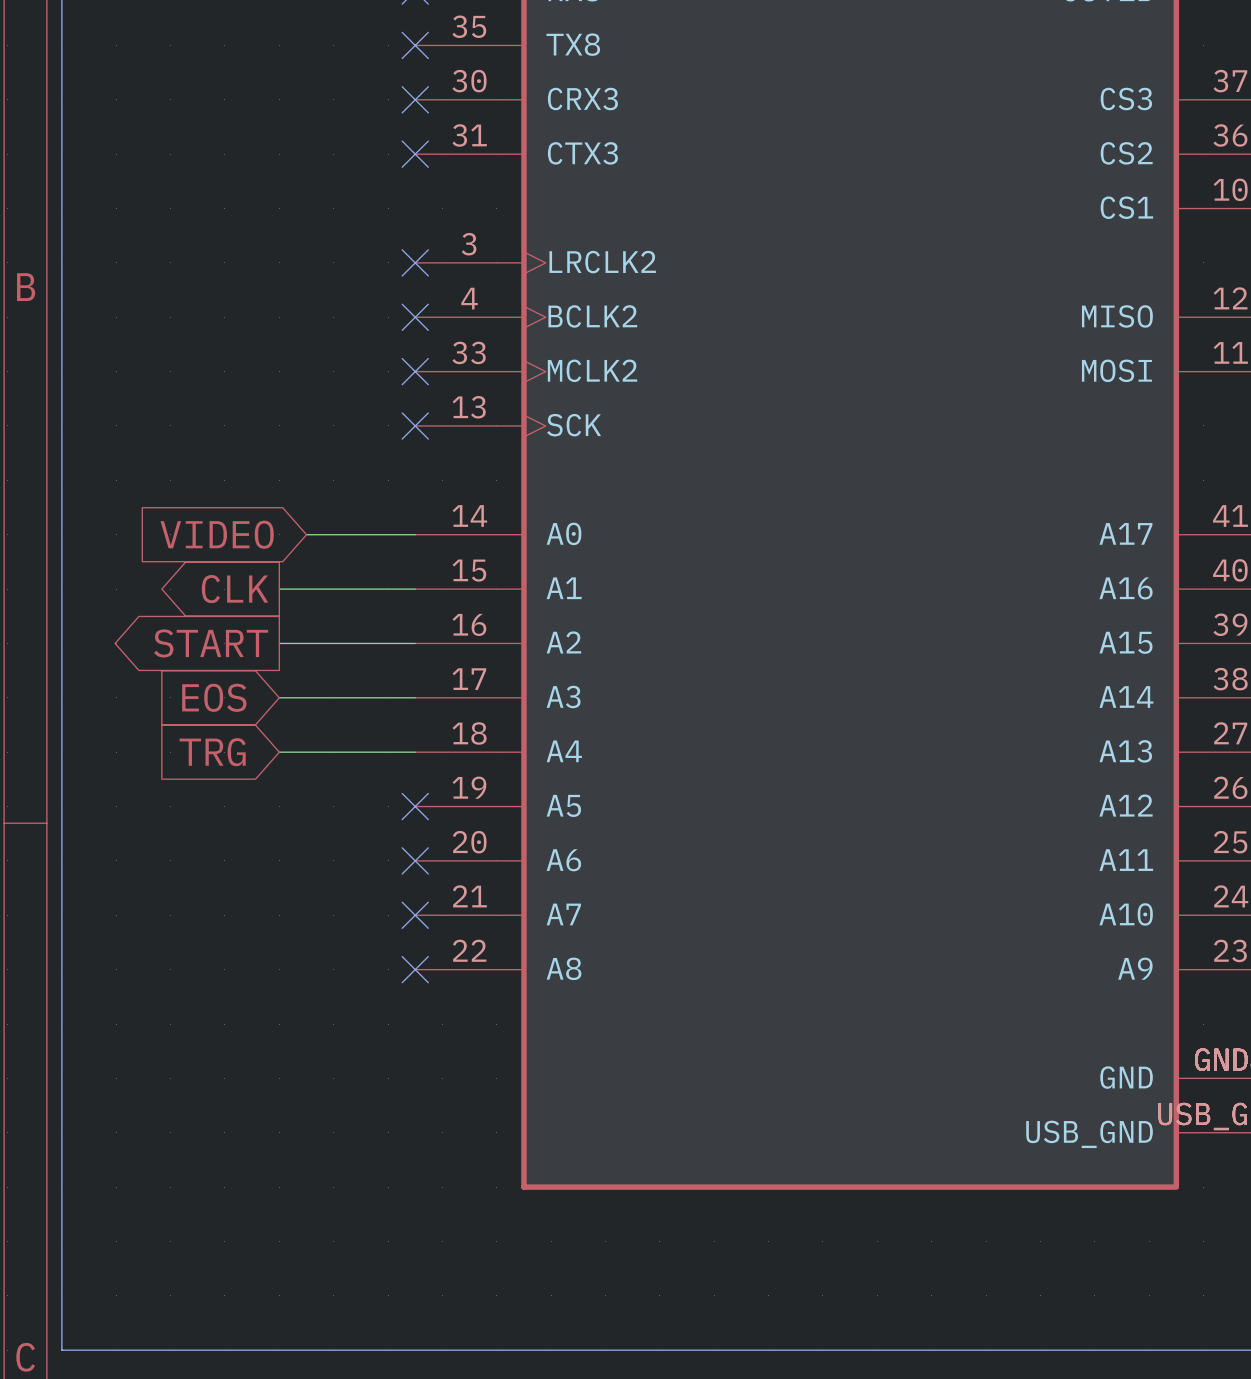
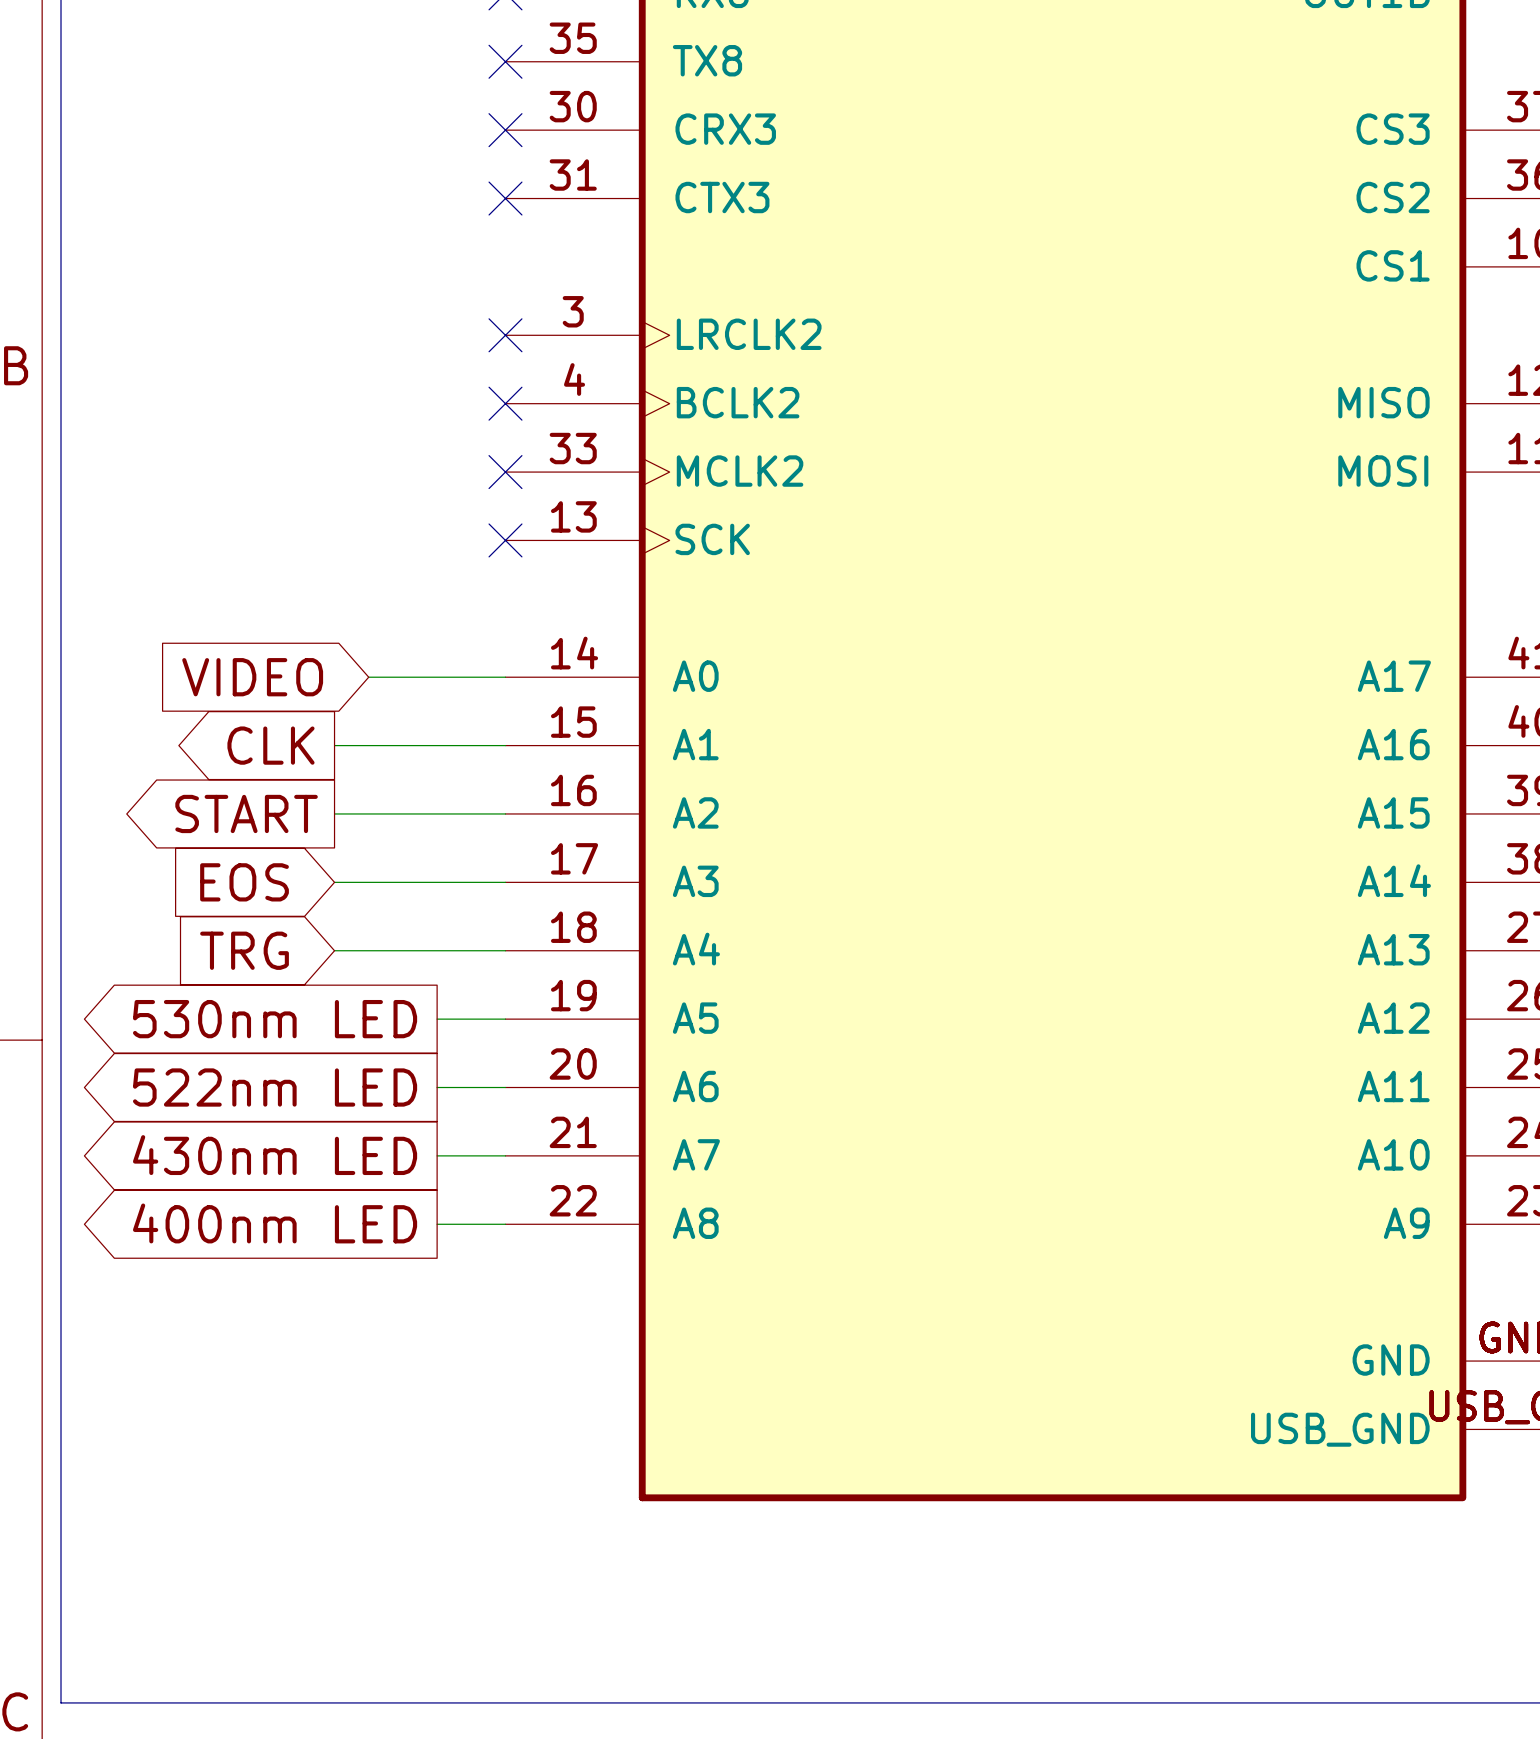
global label: none -> 530nm LED (275, 1019)
wire: none -> (437, 1019) (505, 1019)
no-connect mark: (415, 806) -> none
global label: none -> 522nm LED (275, 1087)
wire: none -> (437, 1087) (505, 1087)
no-connect mark: (415, 860) -> none
global label: none -> 430nm LED (275, 1155)
wire: none -> (437, 1155) (505, 1155)
no-connect mark: (415, 915) -> none
global label: none -> 400nm LED (275, 1223)
wire: none -> (437, 1224) (505, 1224)
no-connect mark: (415, 969) -> none

